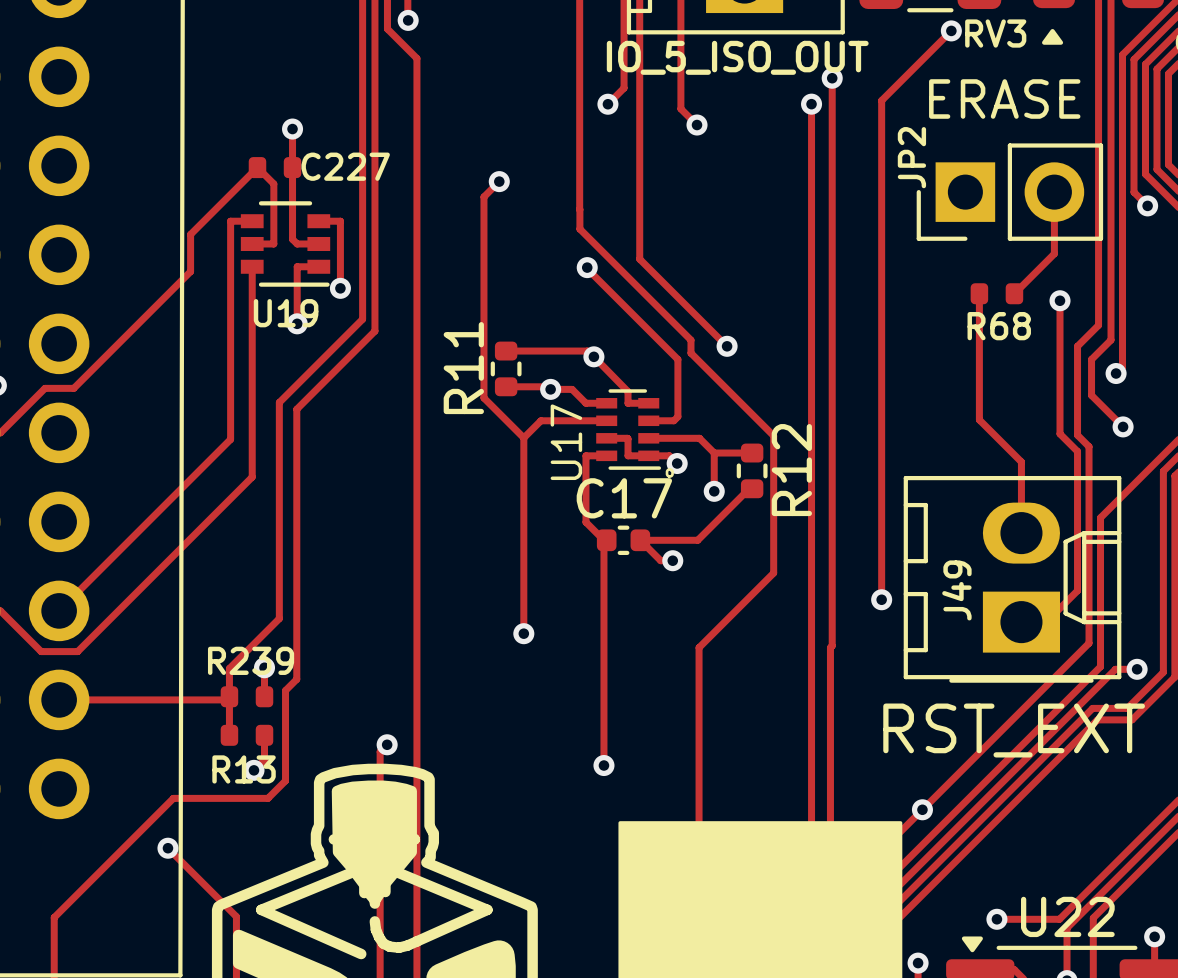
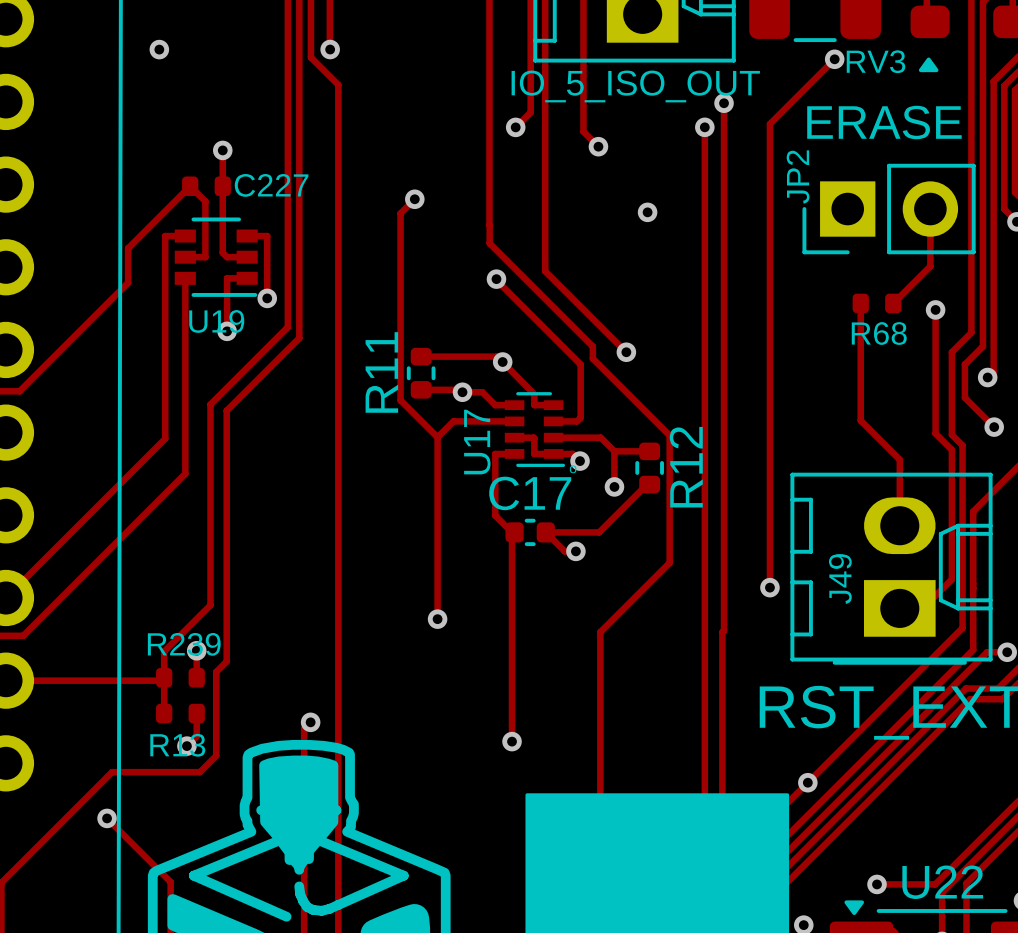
via: none -> (159, 49)
via: none -> (647, 212)

